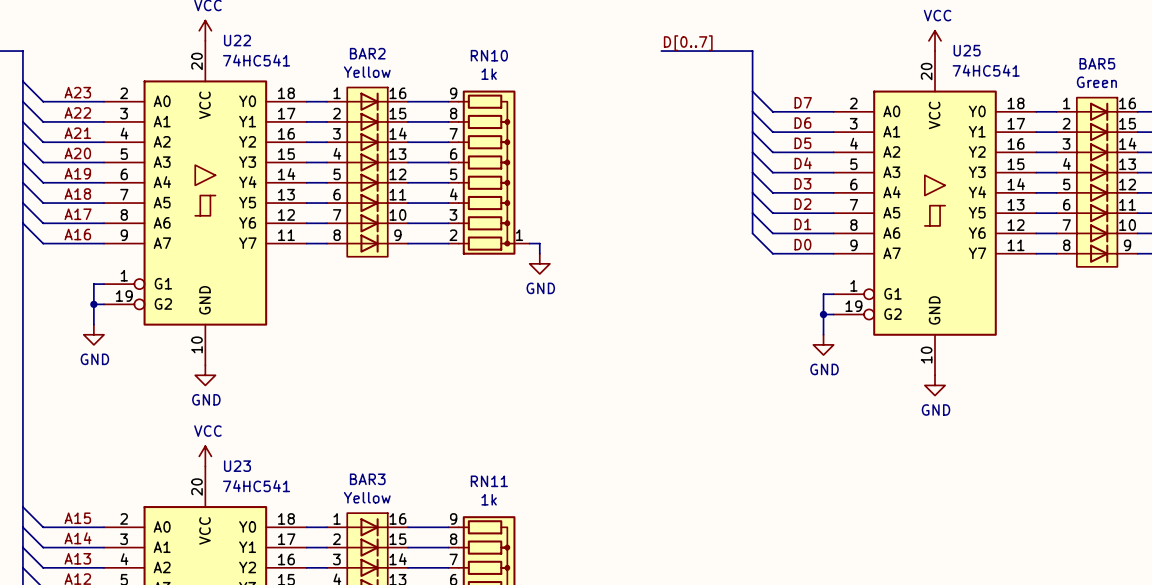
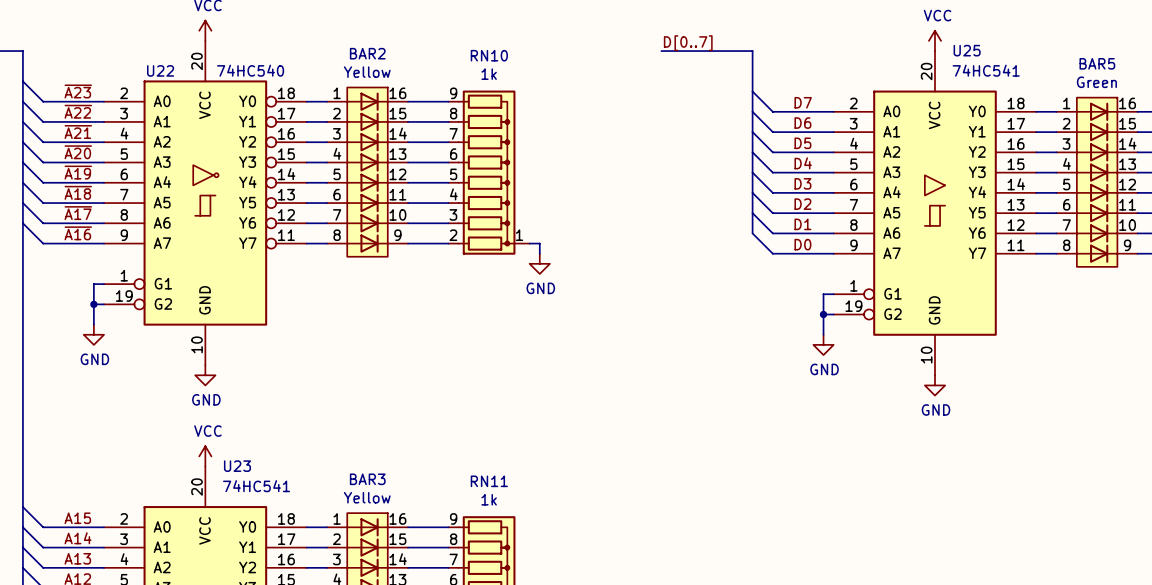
U22 symbol: [104, 40, 307, 366] -> [104, 40, 307, 366]
U22 name position: U22 (237, 40) -> U22 (160, 70)
U22 value: 74HC541 (256, 60) -> 74HC540 (250, 70)
label: A23 (77, 92) -> ~{A23} (78, 91)
label: A22 (77, 112) -> ~{A22} (78, 111)
label: A21 (77, 133) -> ~{A21} (78, 132)
label: A20 (77, 153) -> ~{A20} (78, 152)
label: A19 (77, 173) -> ~{A19} (78, 172)
label: A18 (77, 193) -> ~{A18} (78, 192)
label: A17 (78, 214) -> ~{A17} (78, 213)
label: A16 (77, 234) -> ~{A16} (78, 233)

